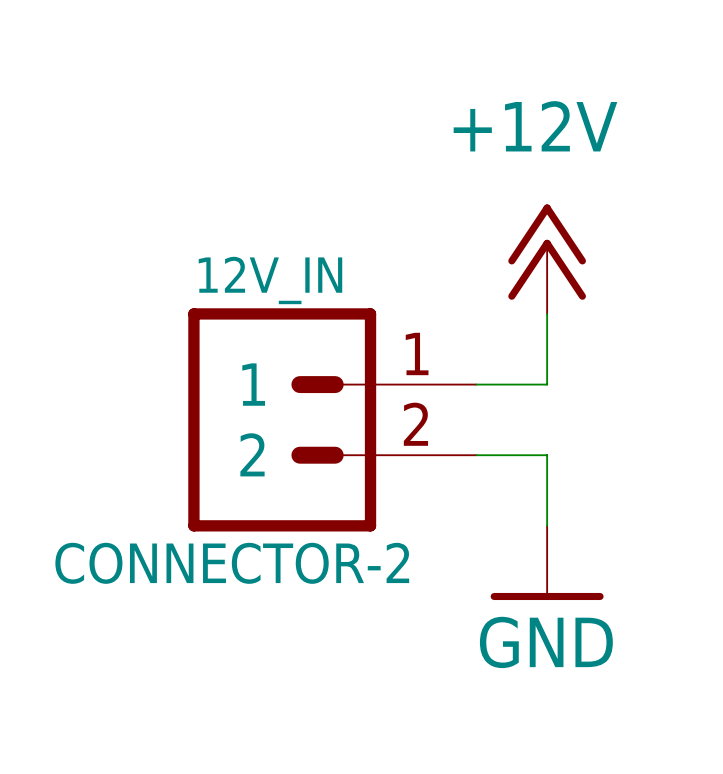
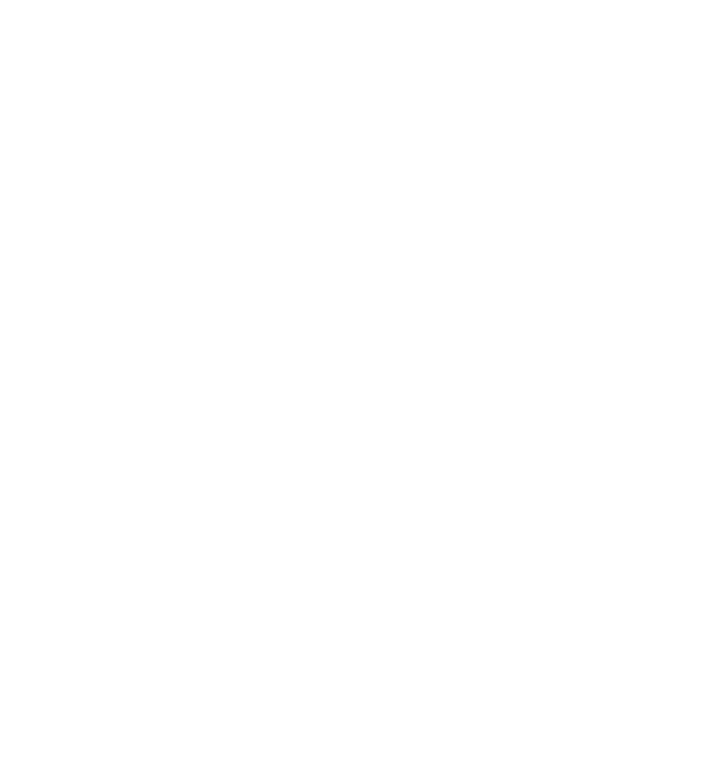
power symbol: +12V (547, 259) -> none
wire: (547, 313) (547, 384) (476, 384) -> none
12V_IN: CONNECTOR-2 (332, 419) -> none
wire: (476, 455) (547, 455) (547, 525) -> none
power symbol: GND (547, 562) -> none

